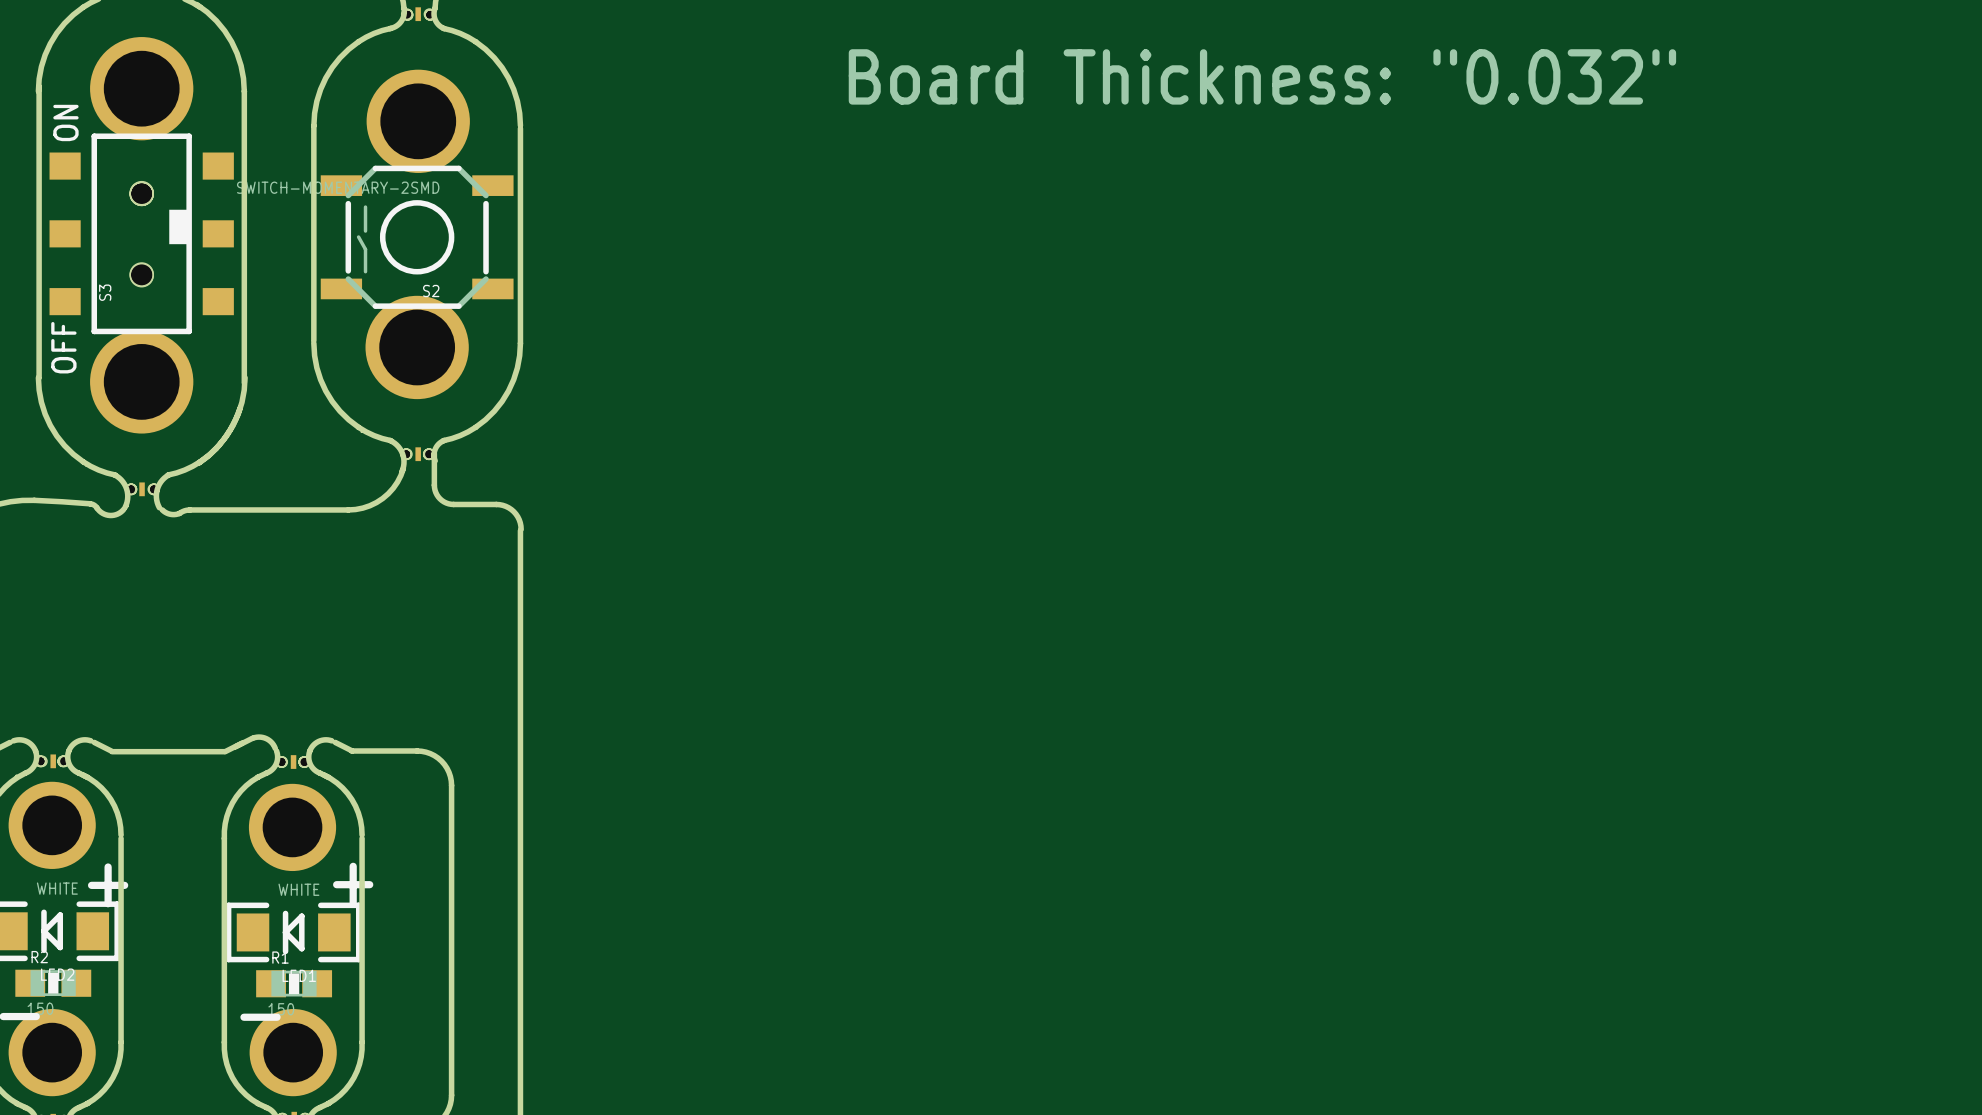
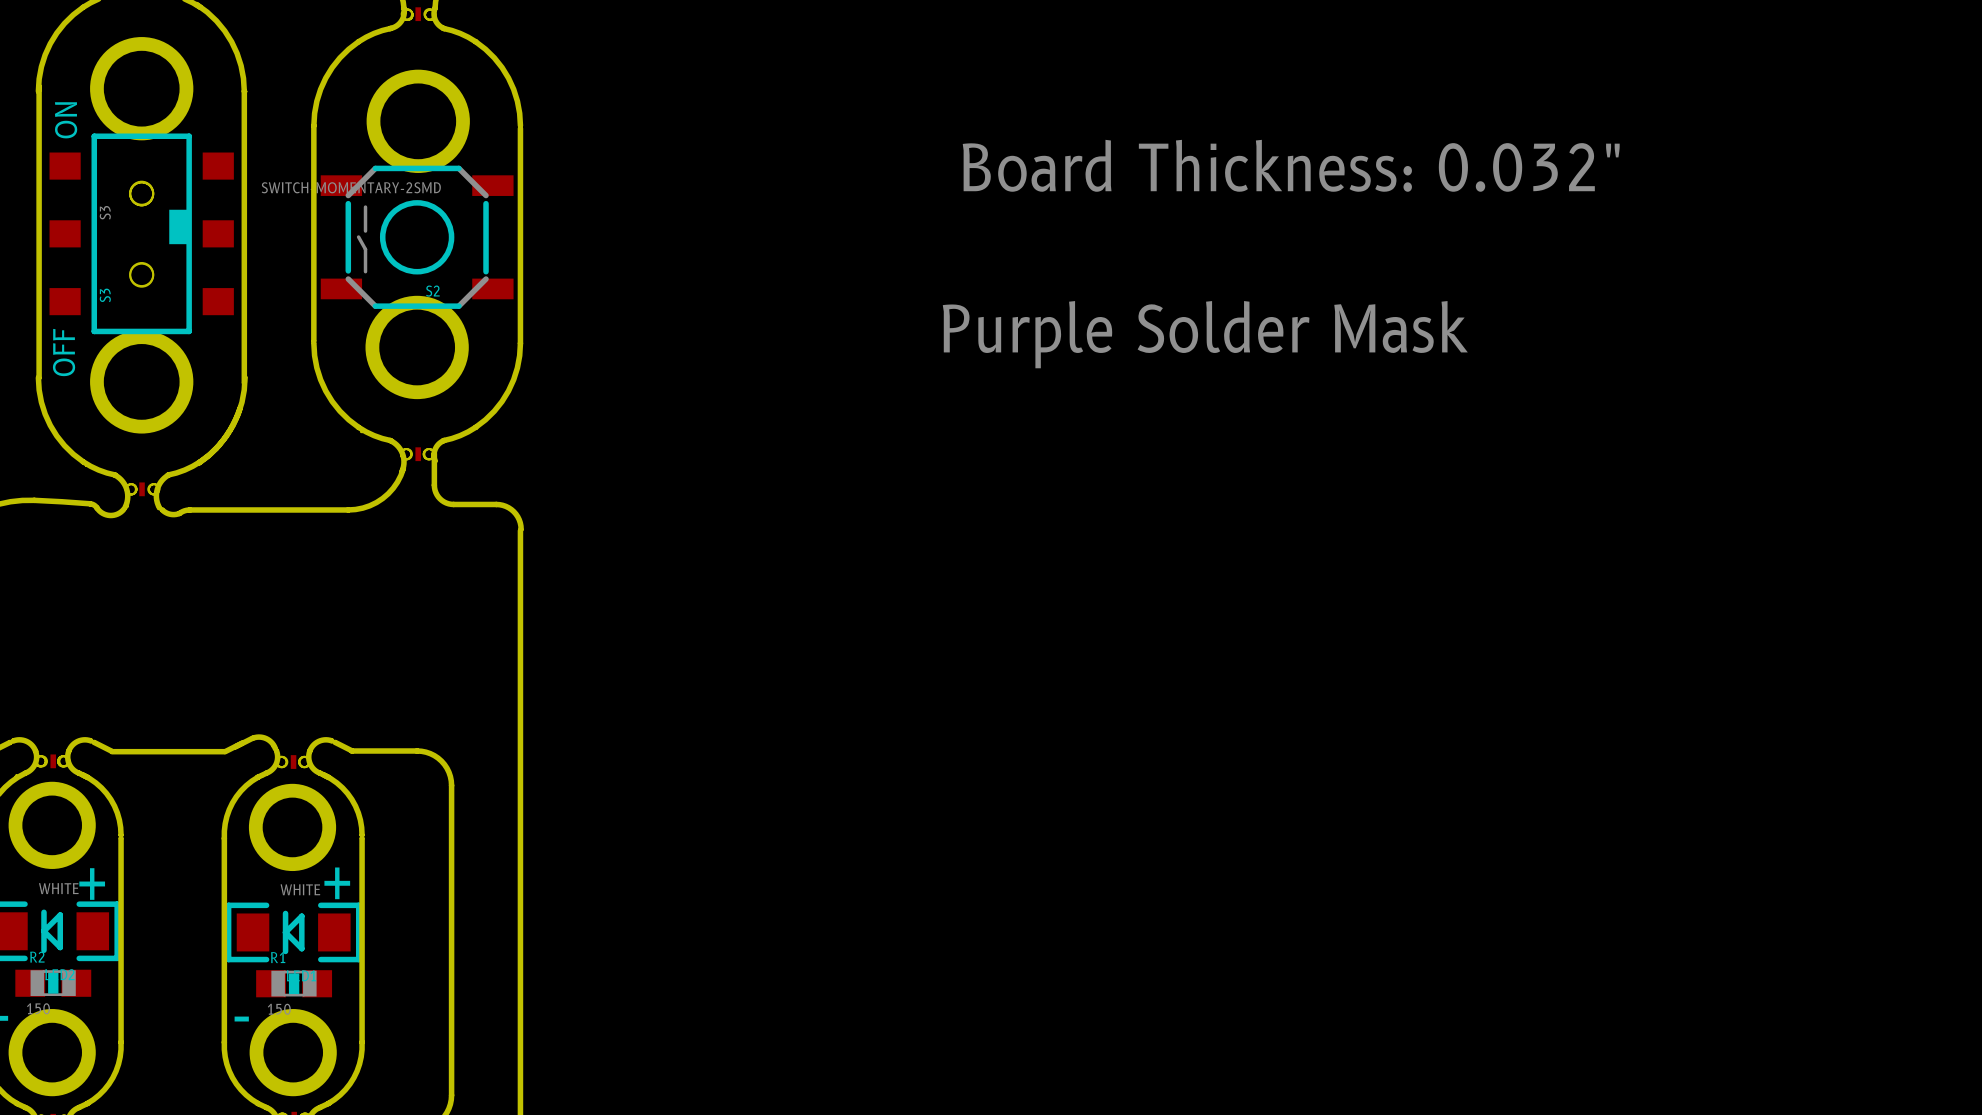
text: Board Thickness: "0.032" (1262, 76) -> Board Thickness: 0.032" (1291, 165)
S3 value: none -> S3 (105, 212)
text: none -> Purple Solder Mask (1205, 334)

